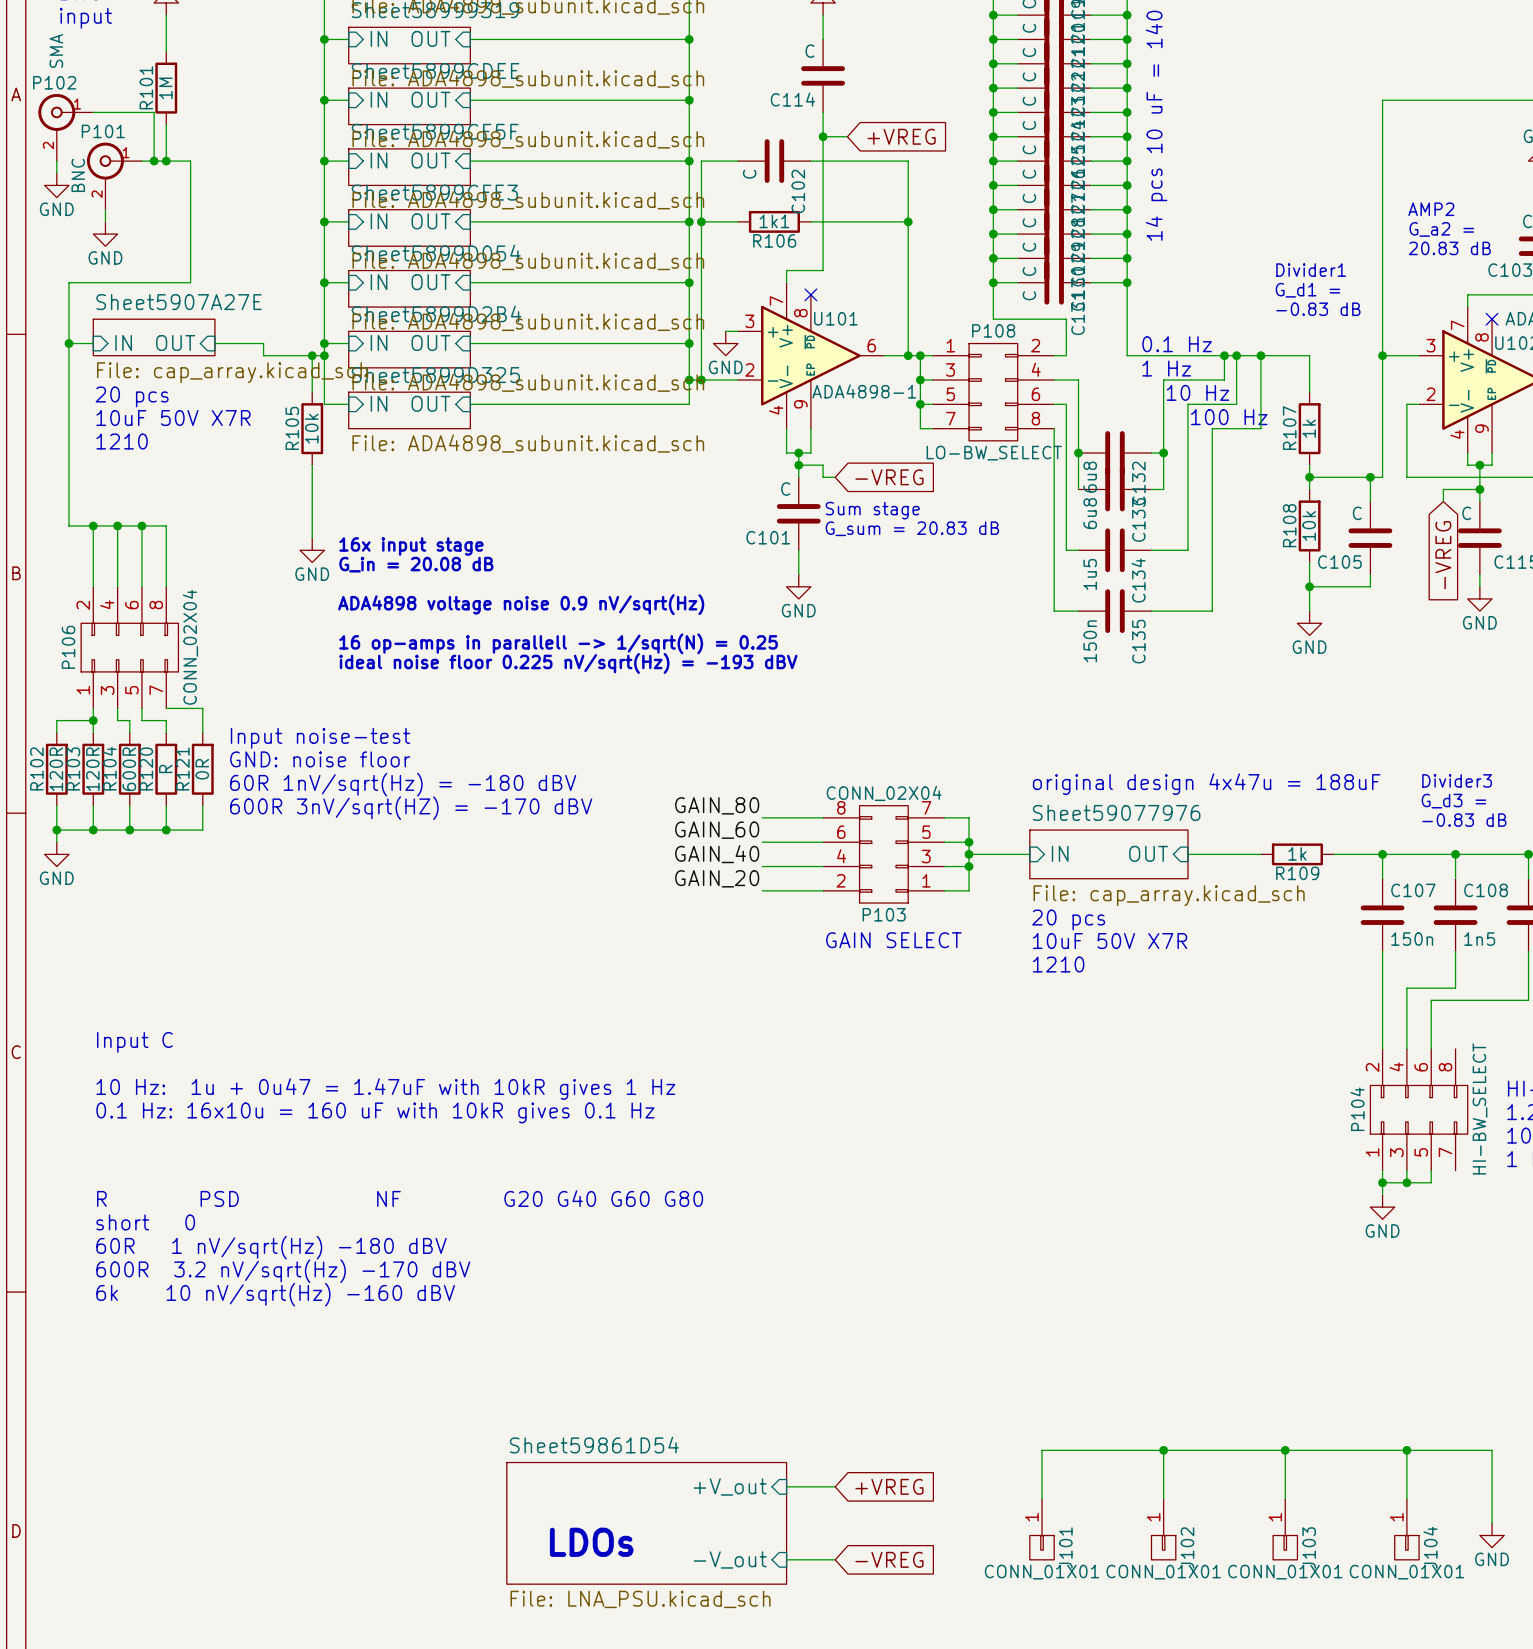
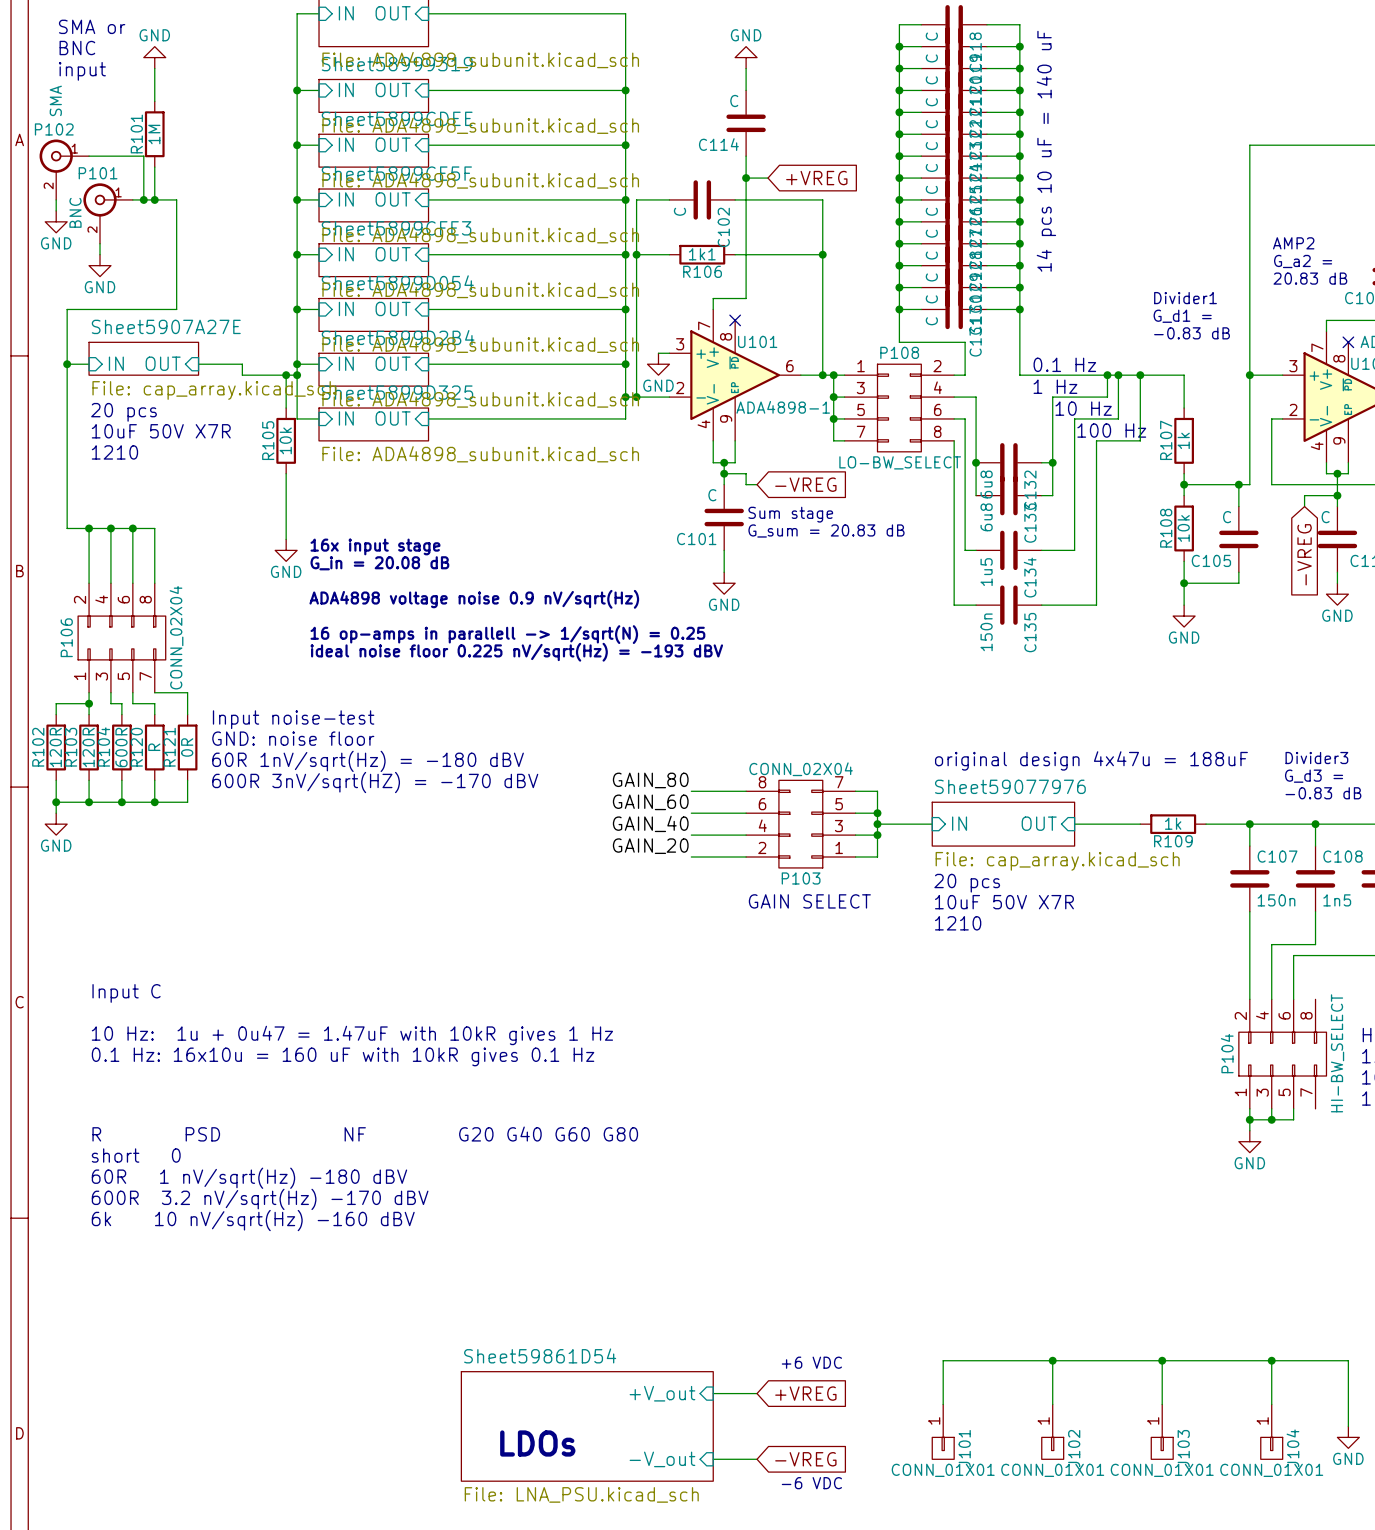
text: none -> +6 VDC (811, 1362)
text: none -> -6 VDC (811, 1483)

